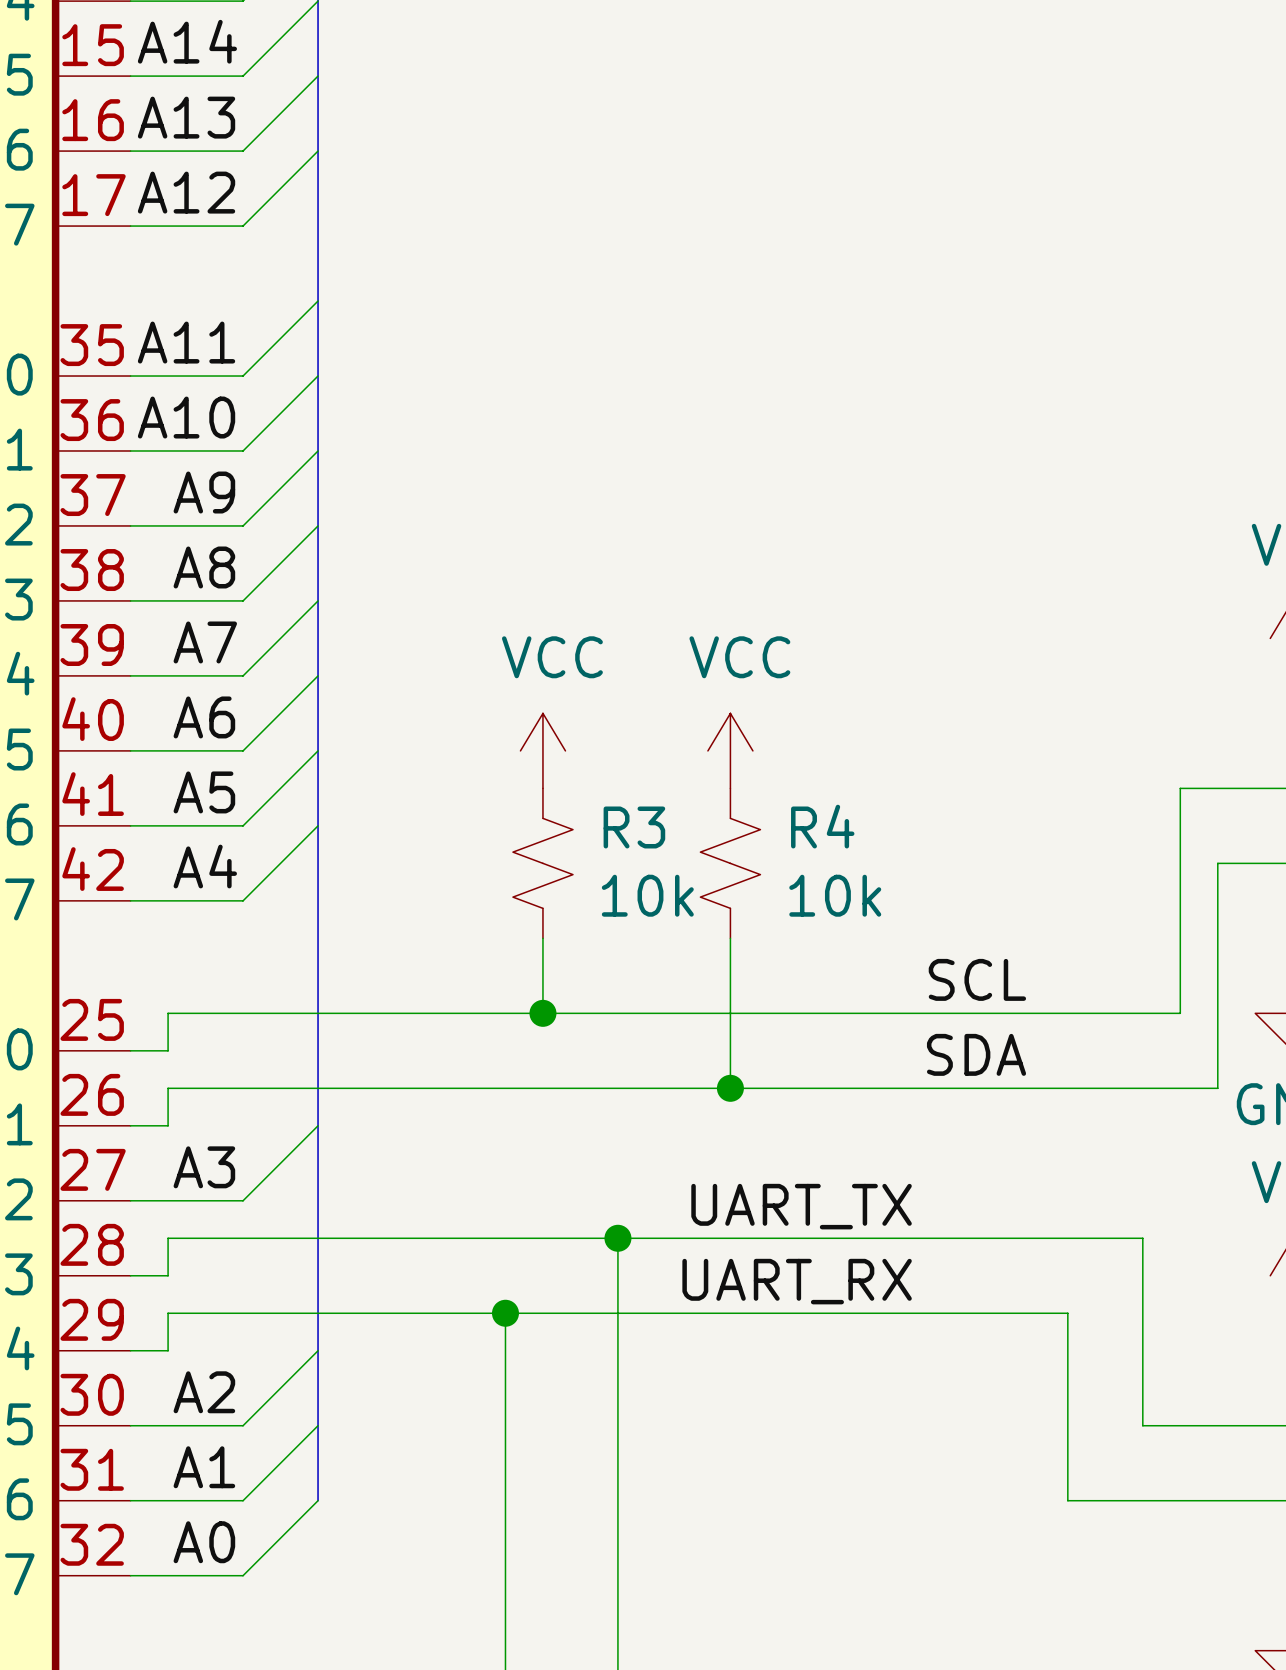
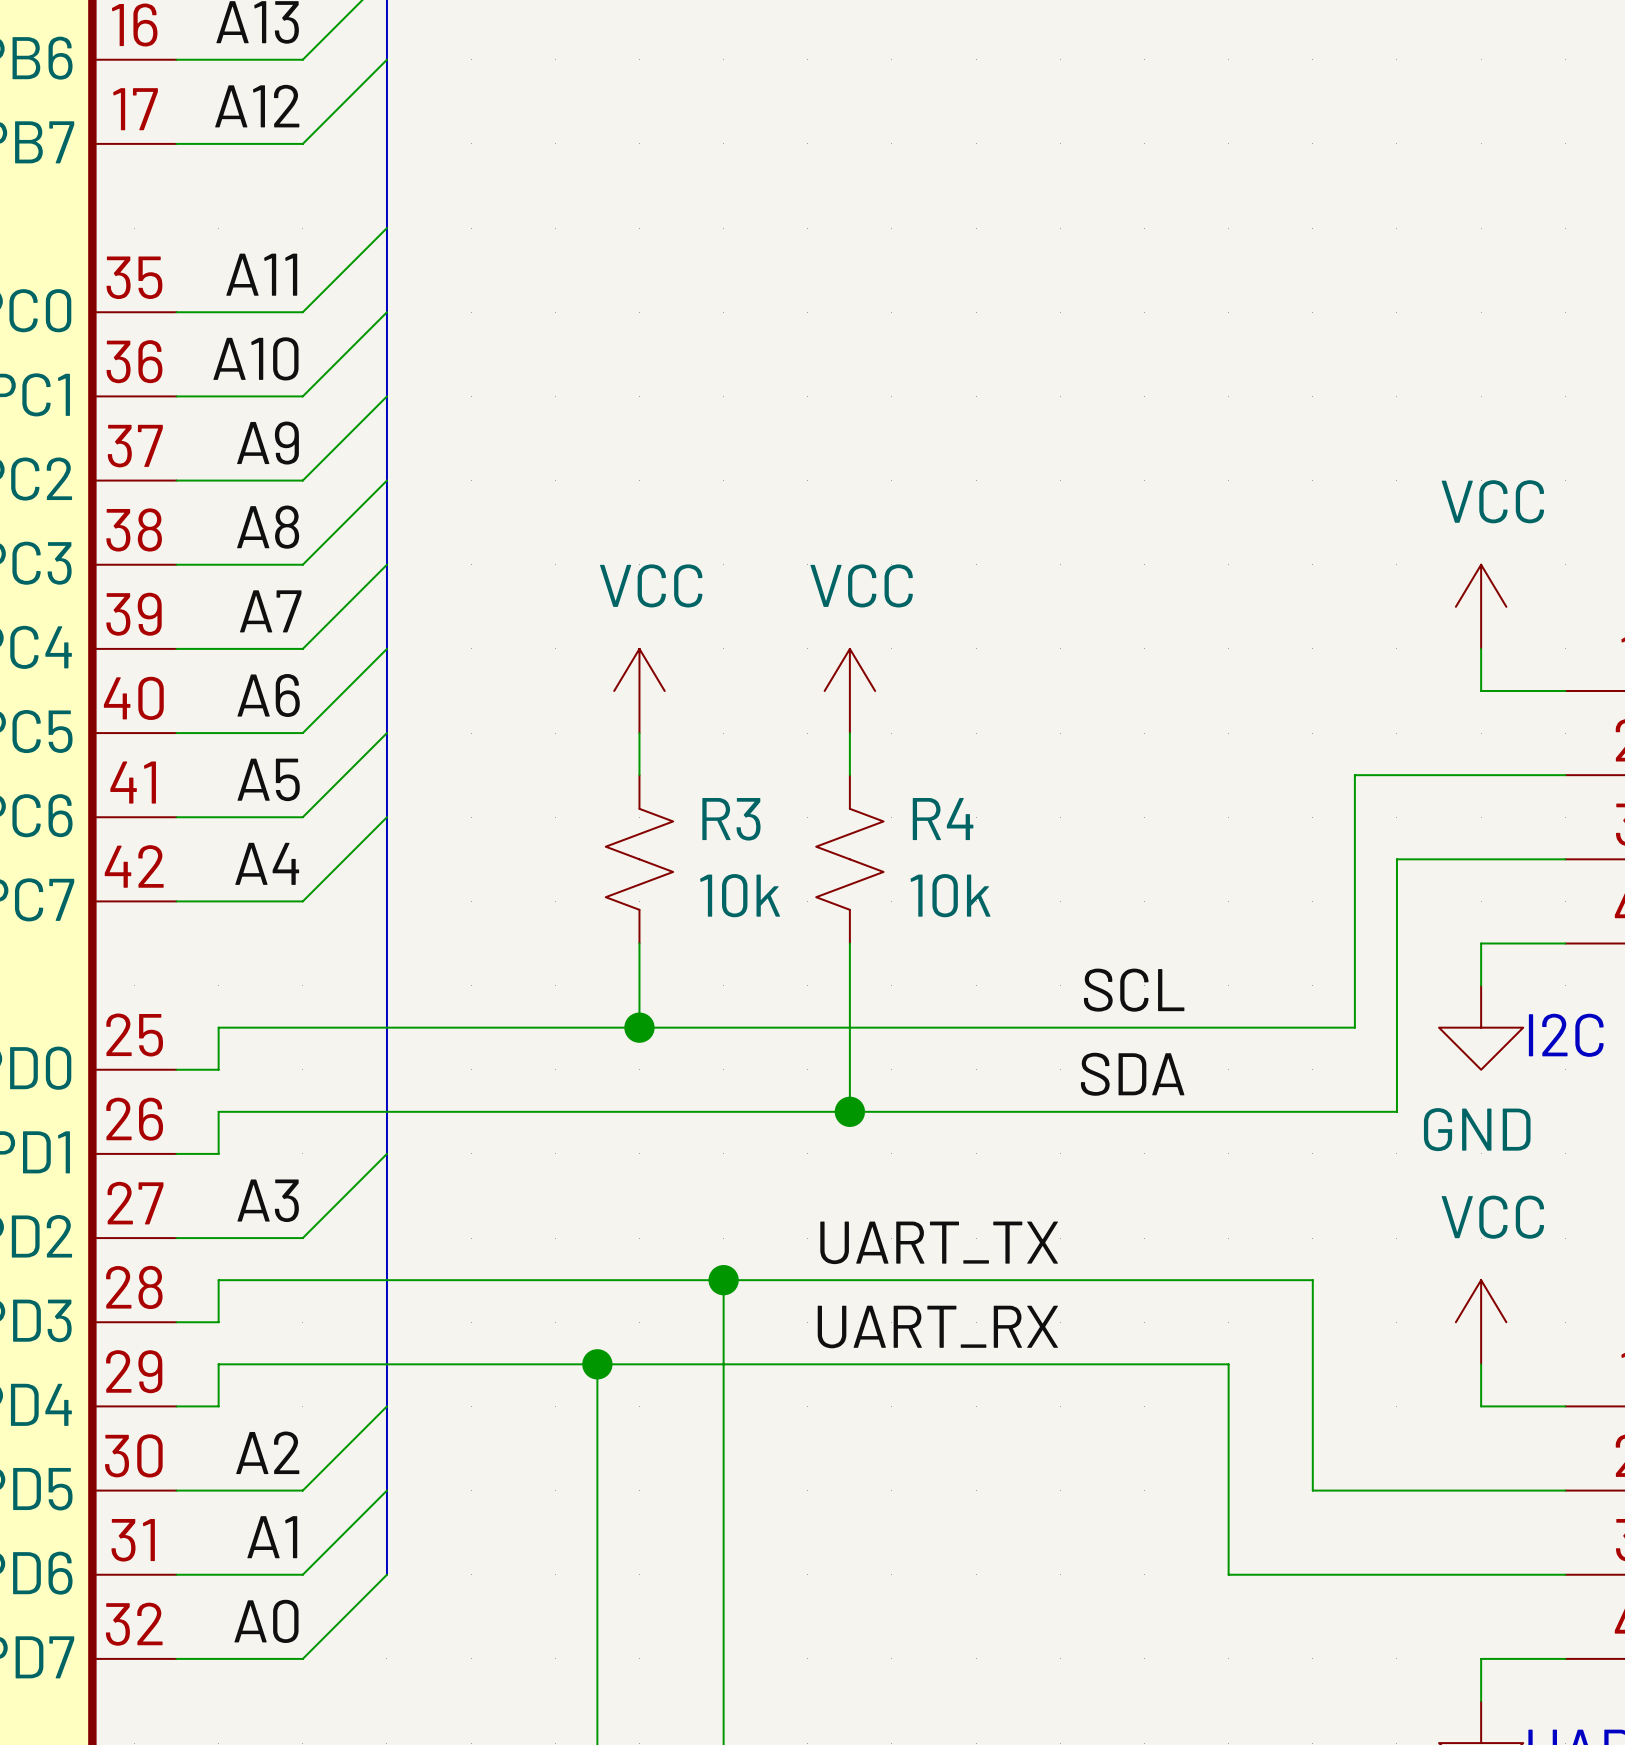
power symbol position: VCC (542, 750) -> VCC (639, 690)
power symbol position: VCC (730, 750) -> VCC (849, 690)

